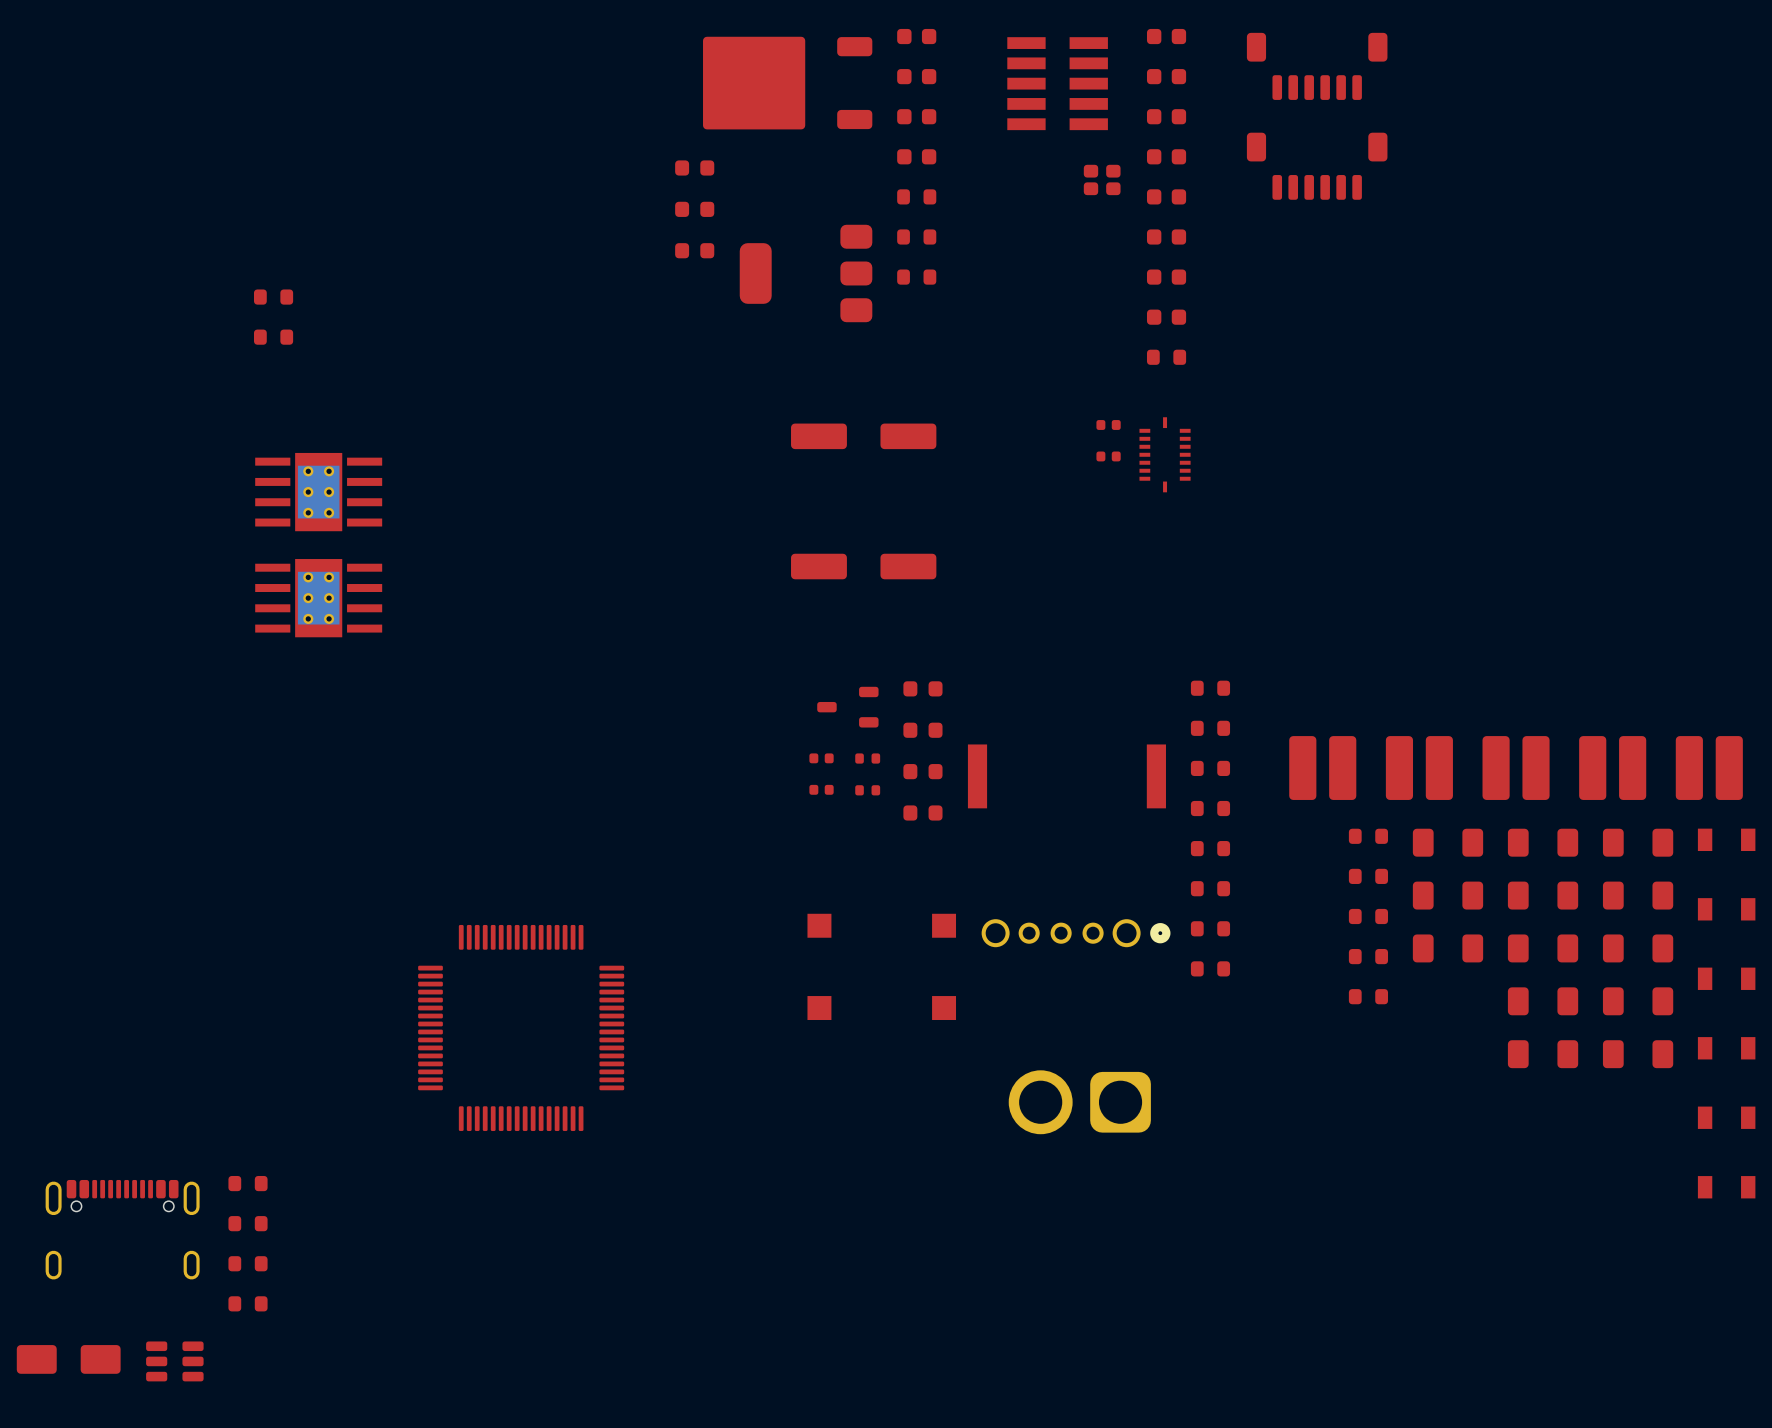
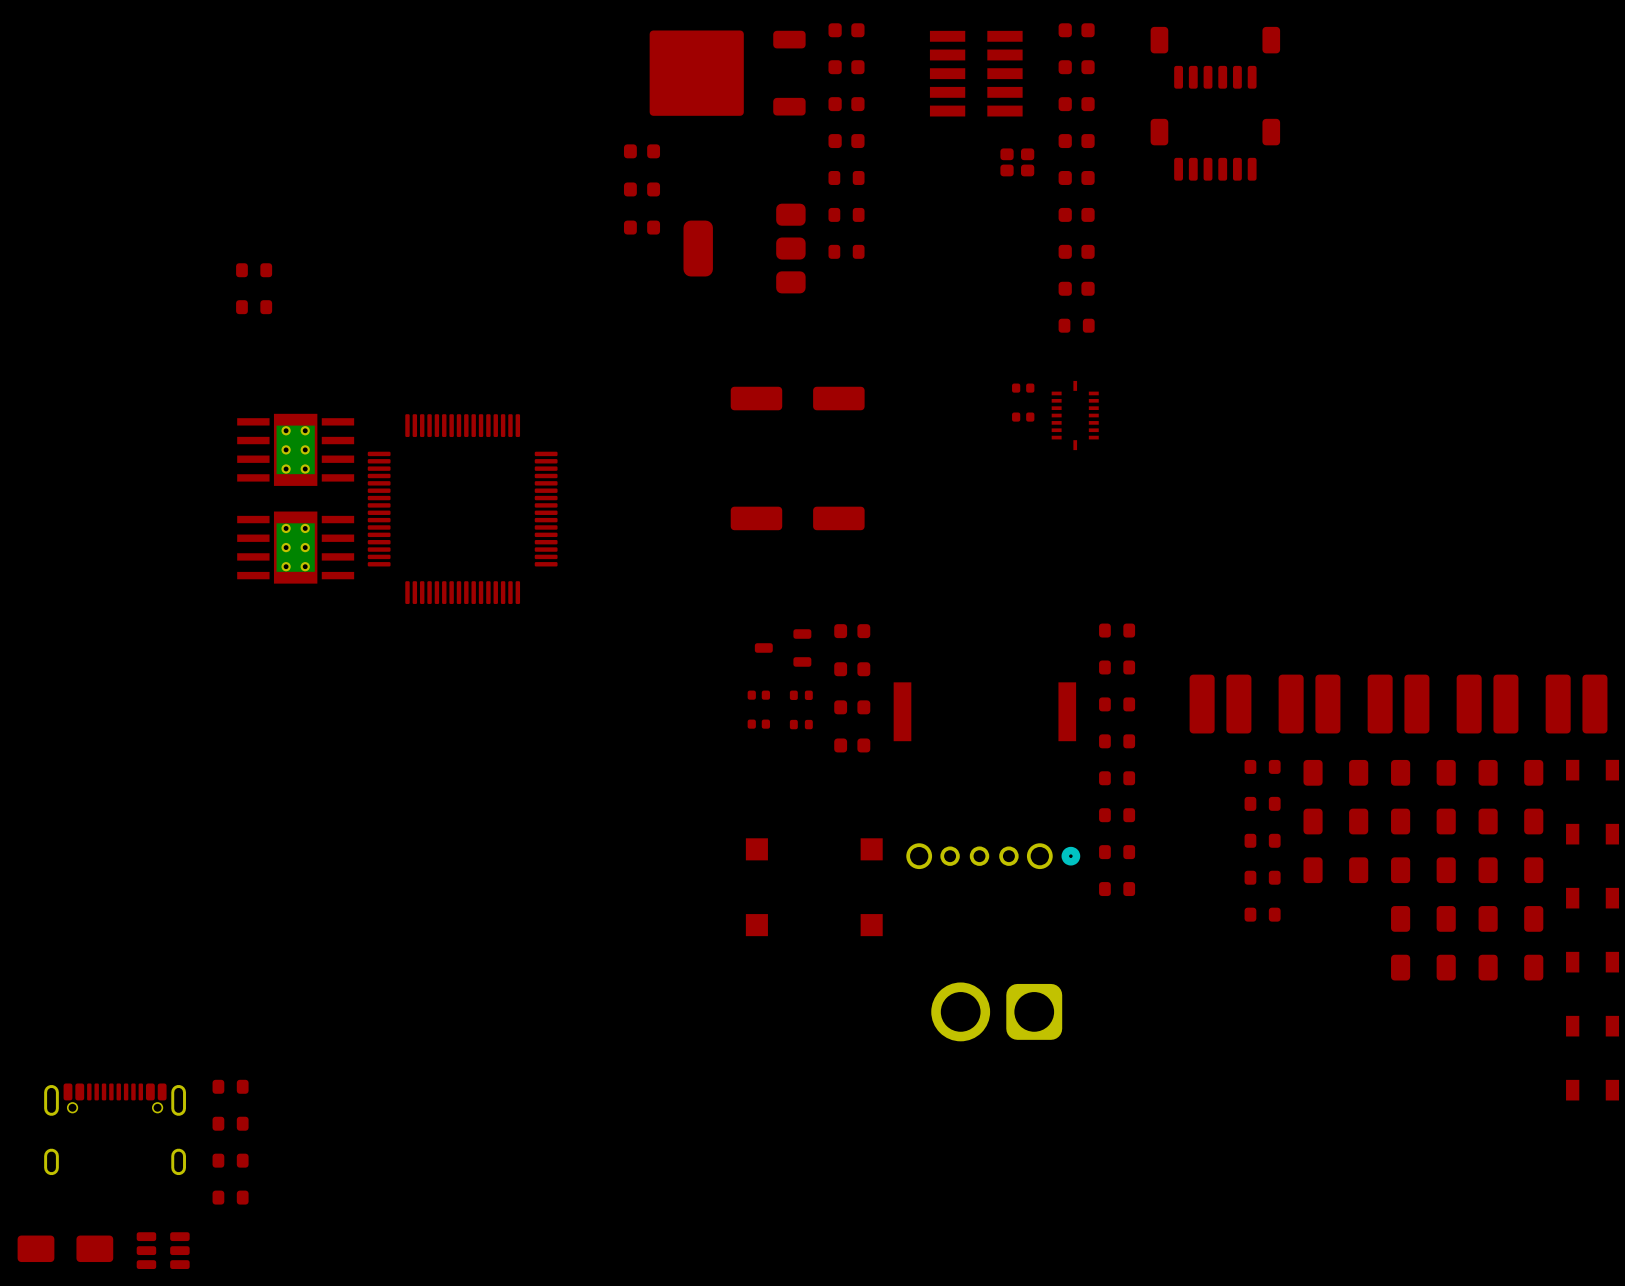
part: none -> (462, 509)
part: (521, 1027) -> none

